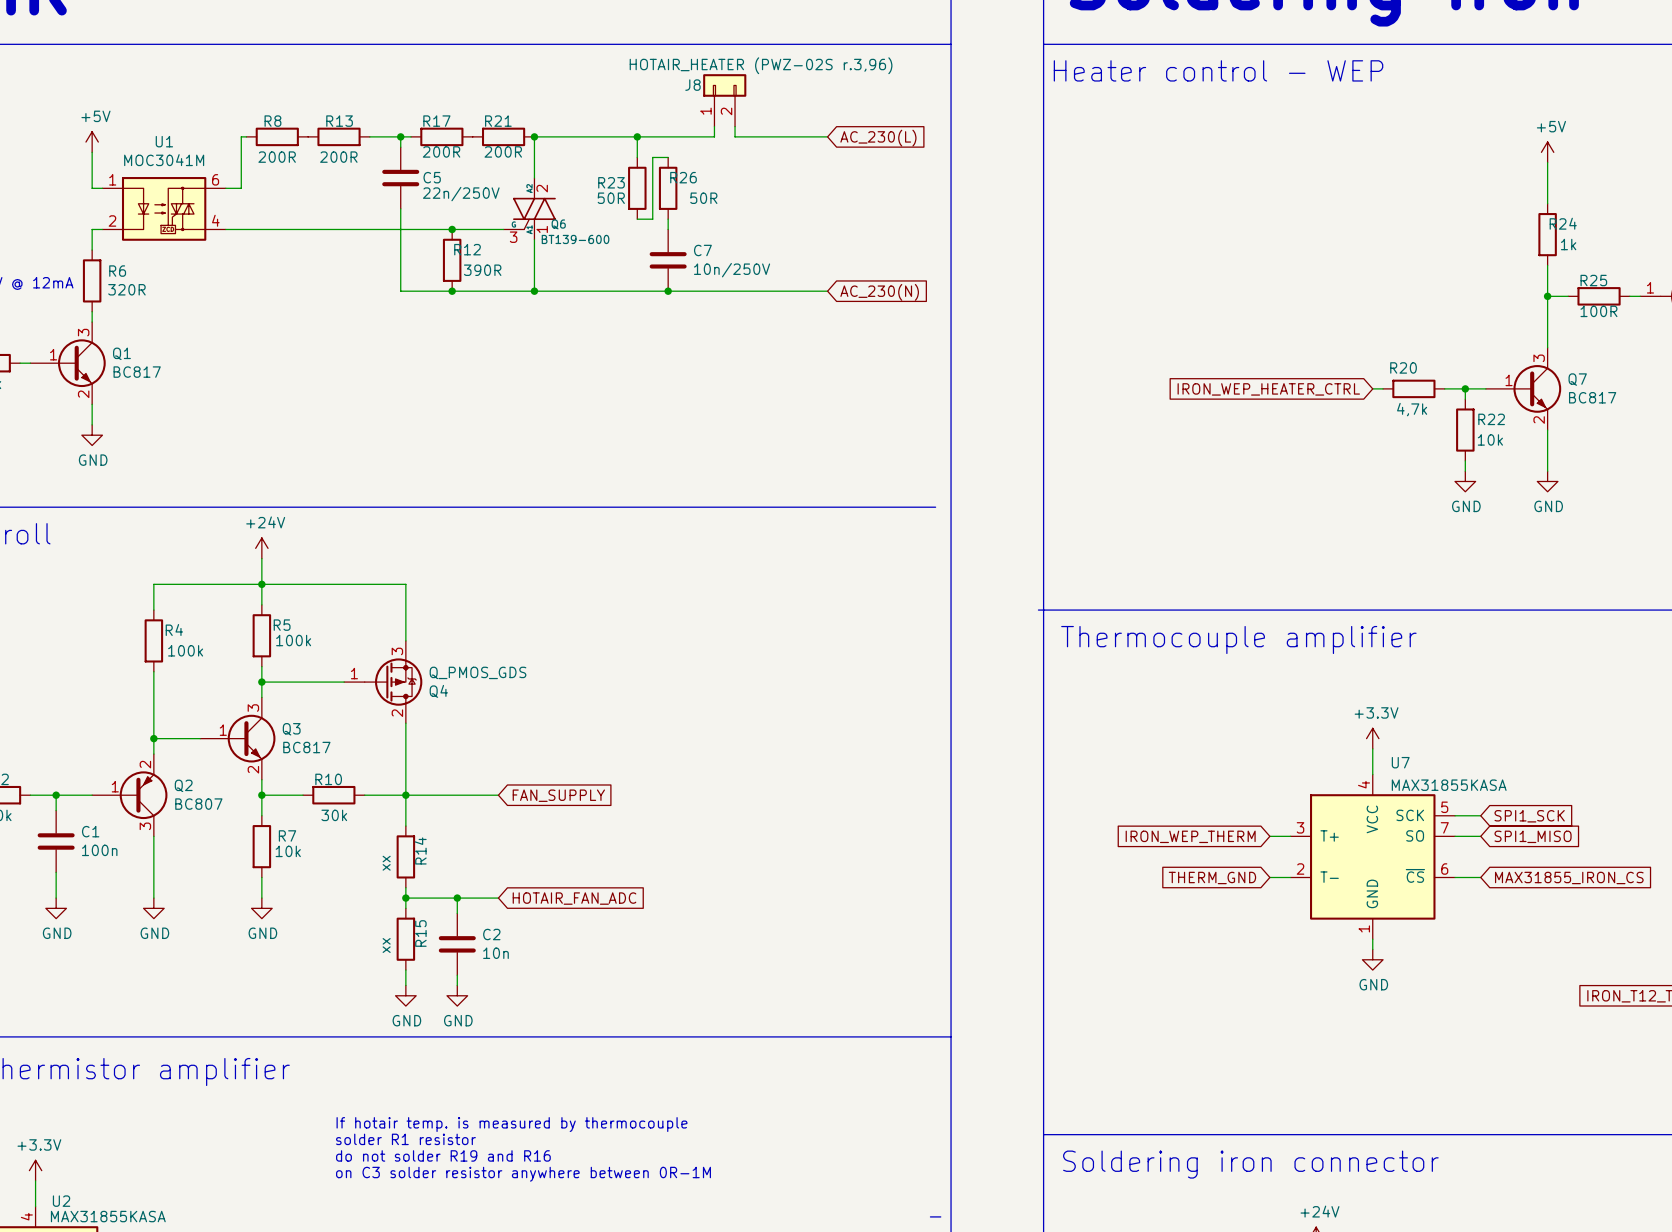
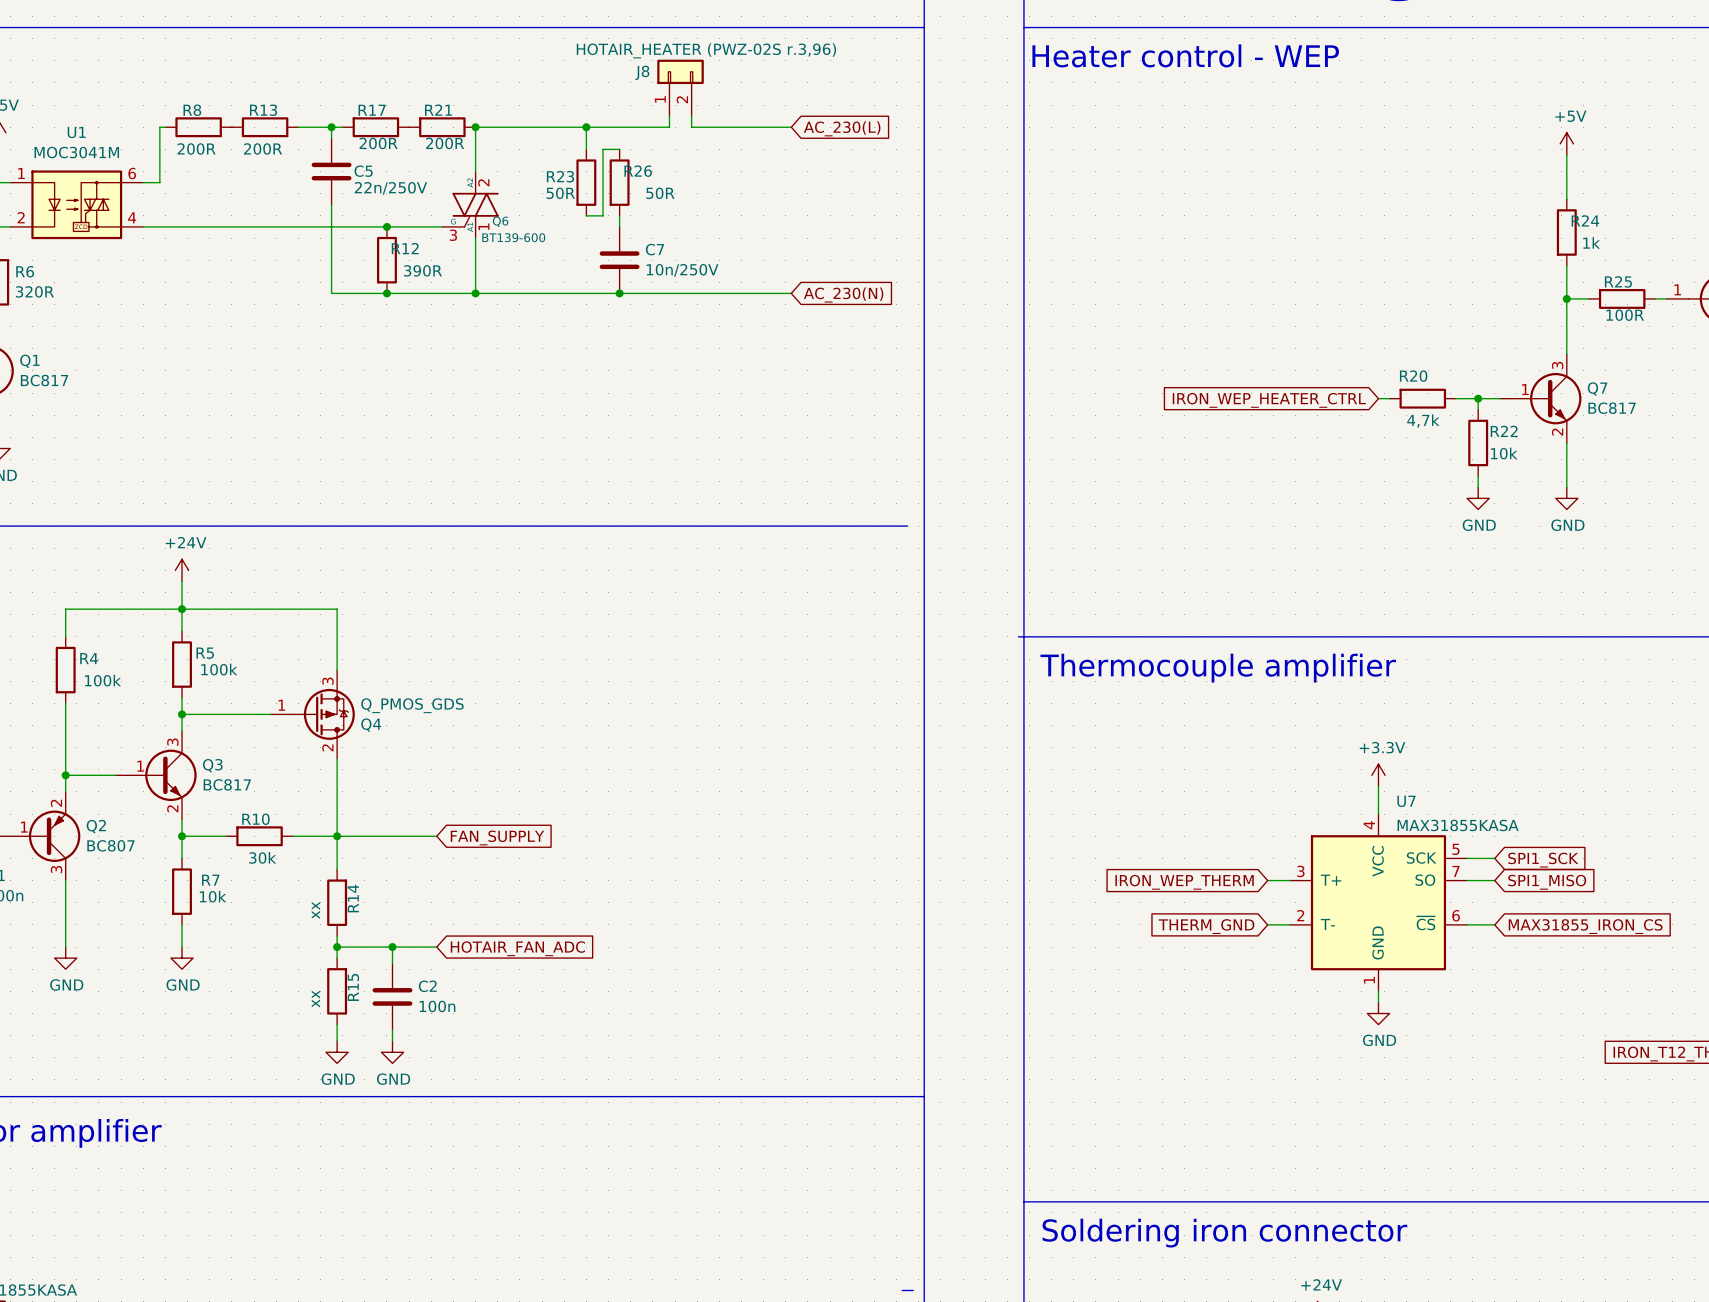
C2 value: 10n (495, 953) -> 100n (437, 1006)
text: If hotair temp. is measured by thermocouple (511, 1124) -> none
text: solder R1 resistor (405, 1139) -> none
text: do not solder R19 and R16 (443, 1155) -> none
text: on C3 solder resistor anywhere between 0R-1M (523, 1174) -> none

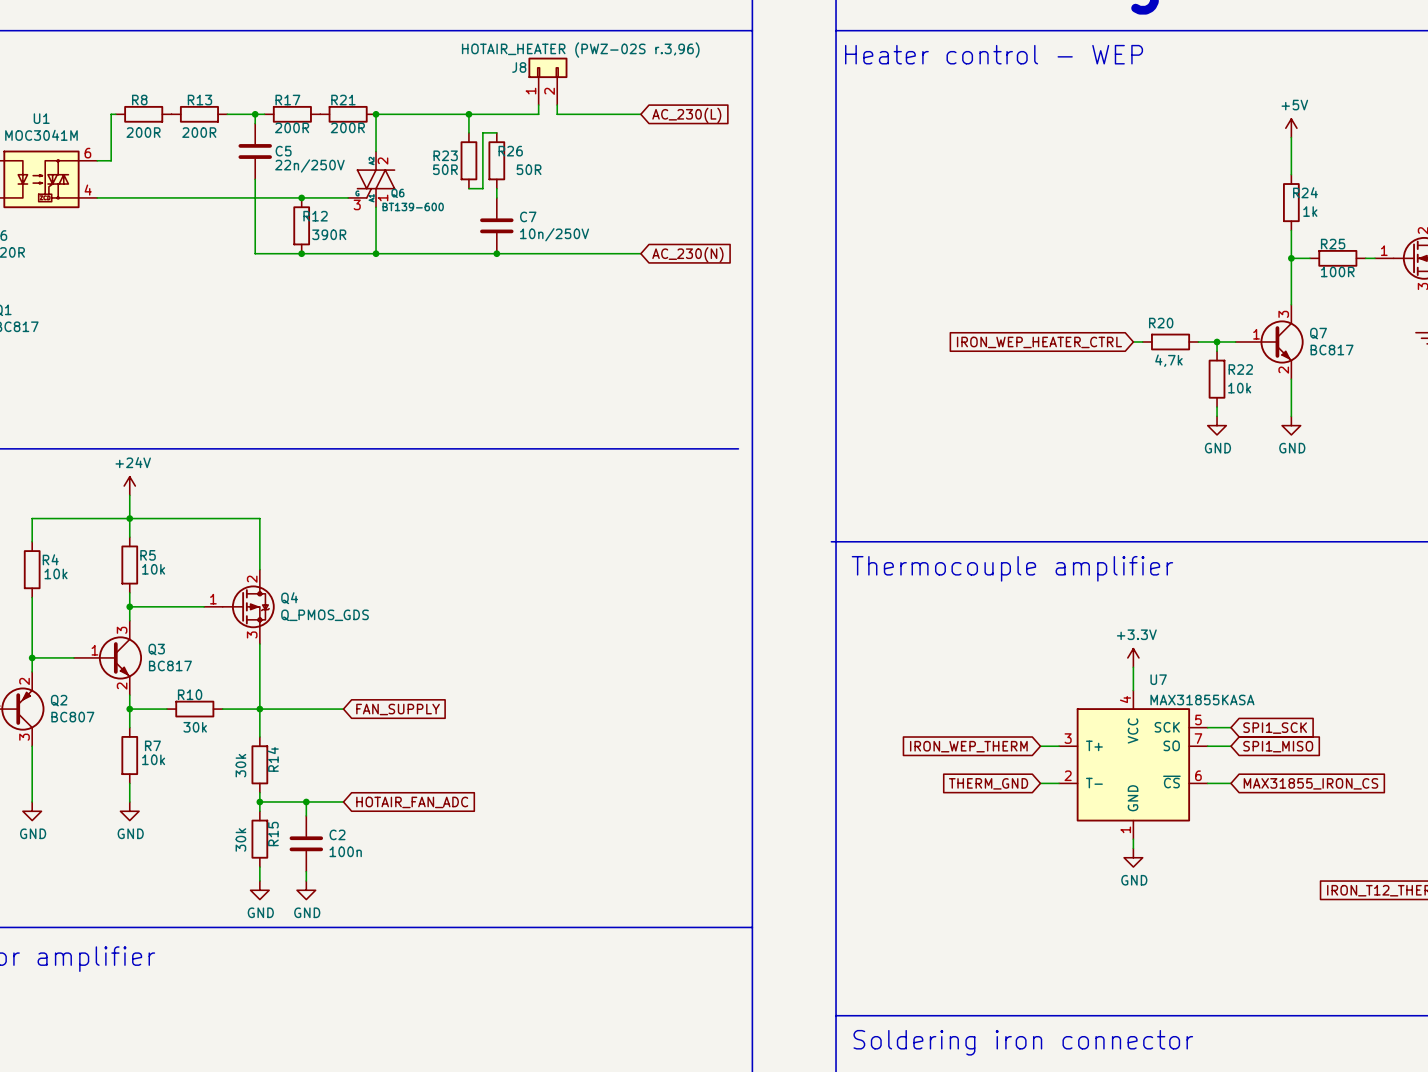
R5 value: 100k (219, 669) -> 10k (153, 569)
R4 value: 100k (102, 680) -> 10k (56, 573)
Q4 flip: as is (323, 714) -> up-down (248, 606)
R14 value: xx (315, 910) -> 30k (240, 765)
R15 value: xx (315, 999) -> 30k (240, 839)

